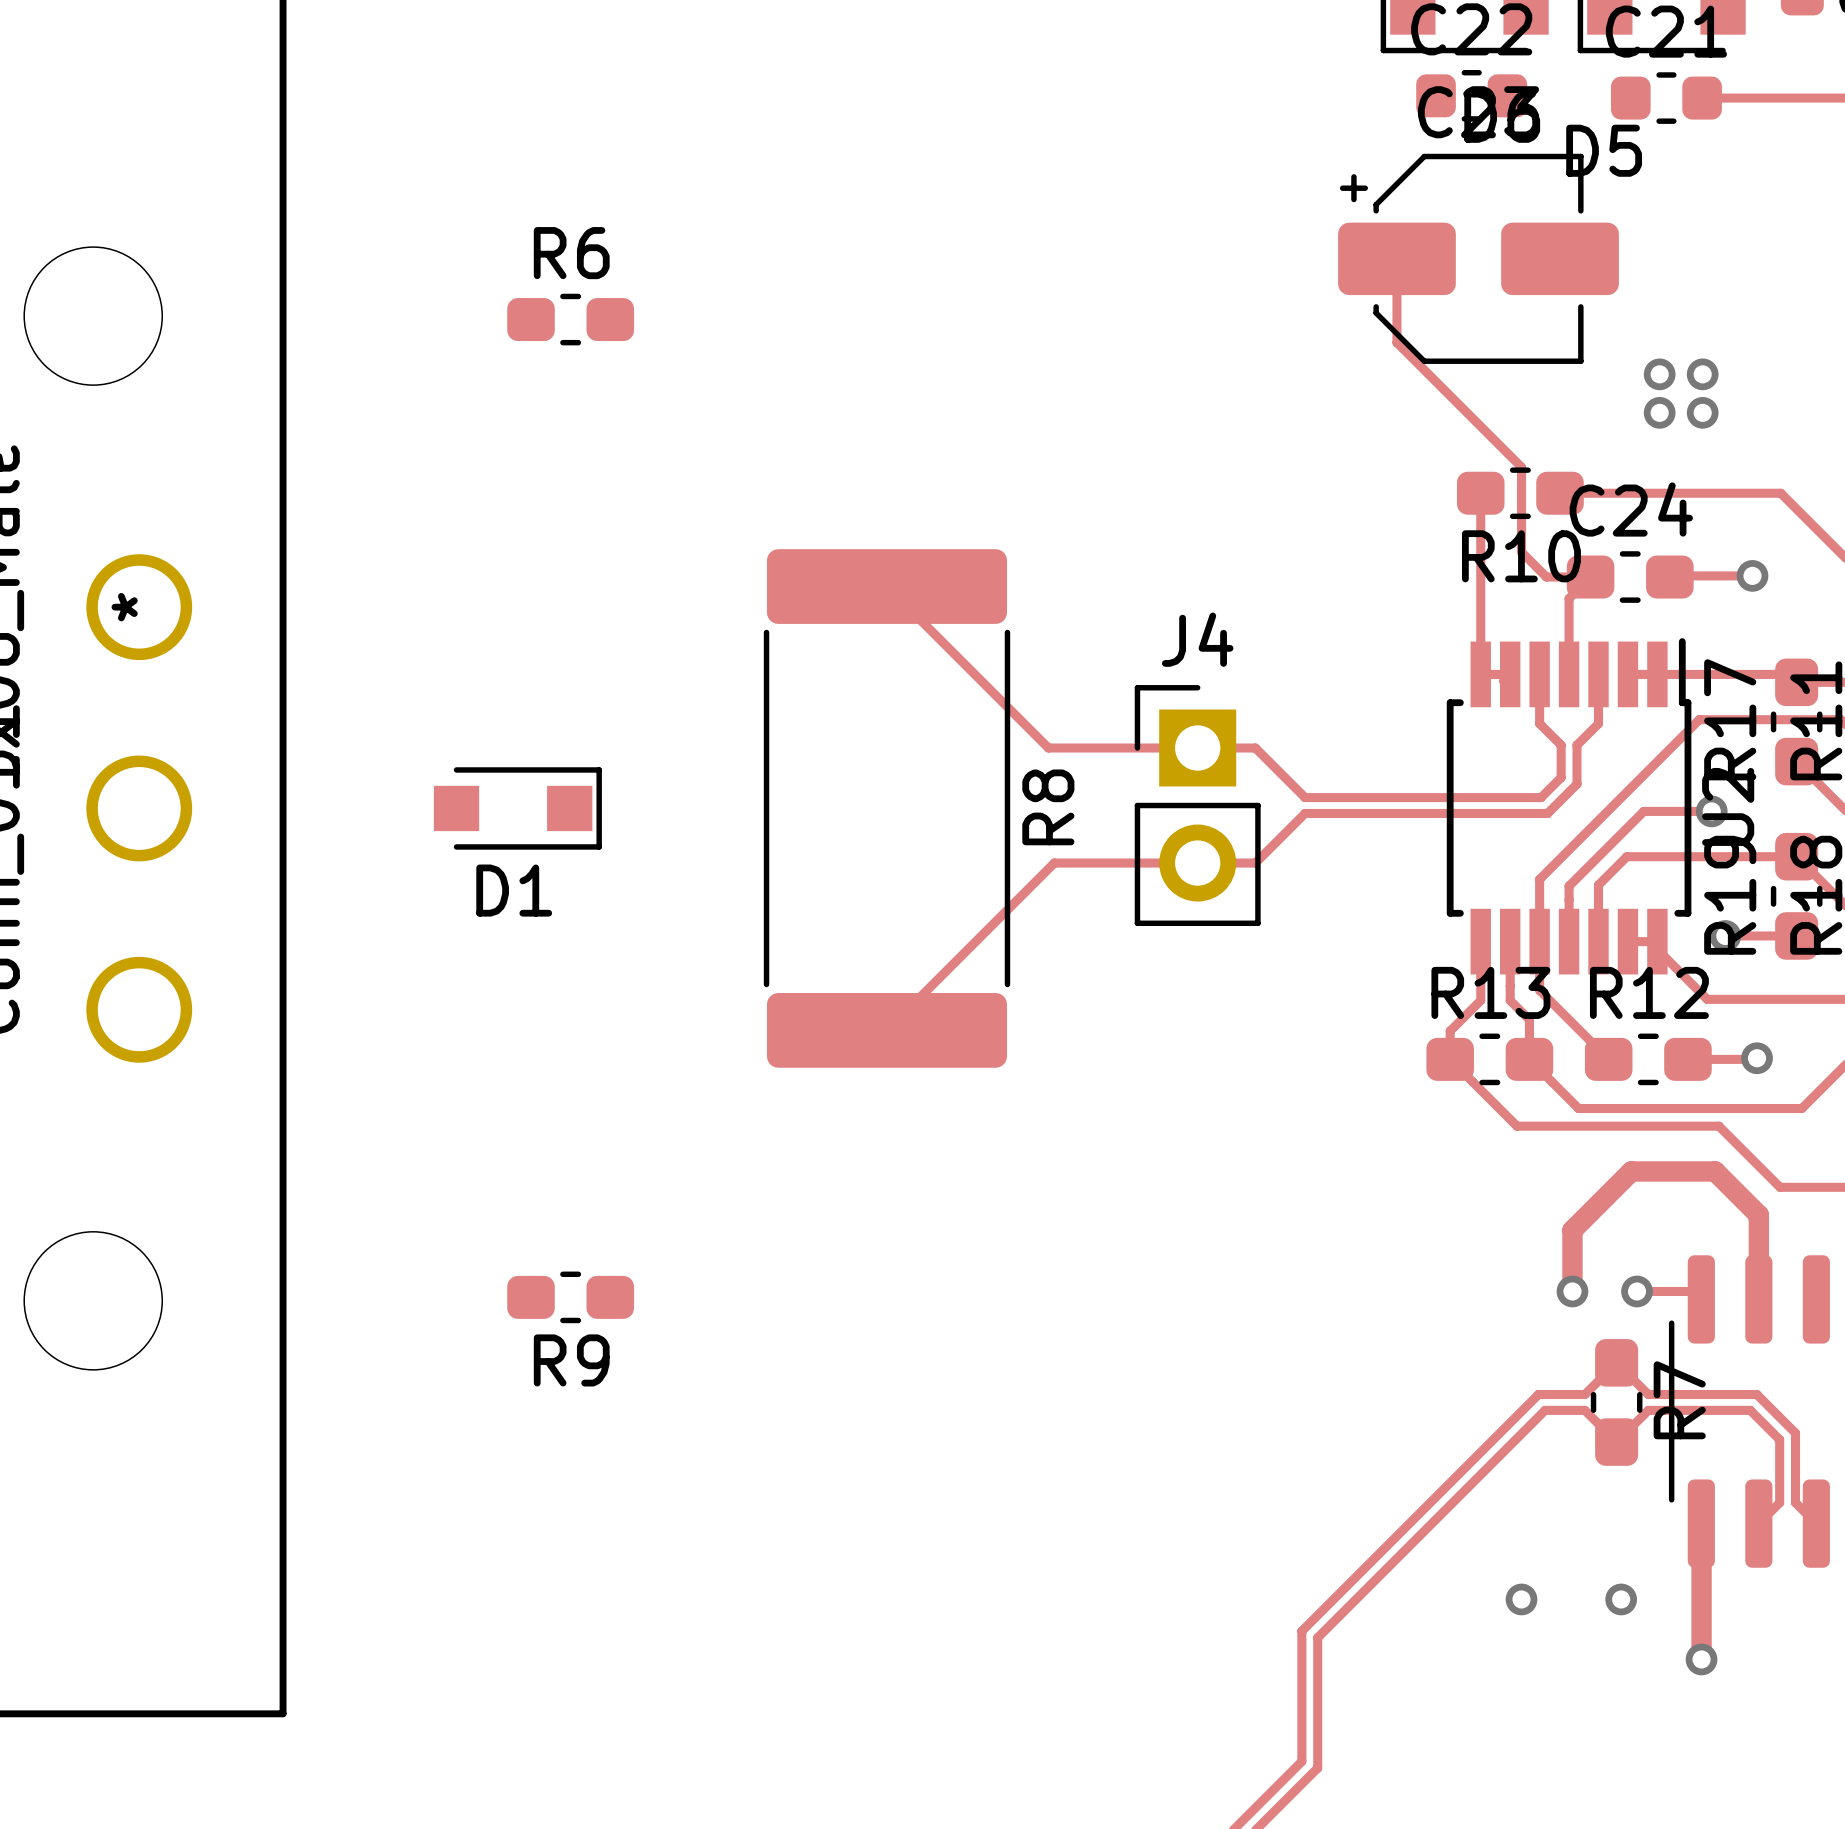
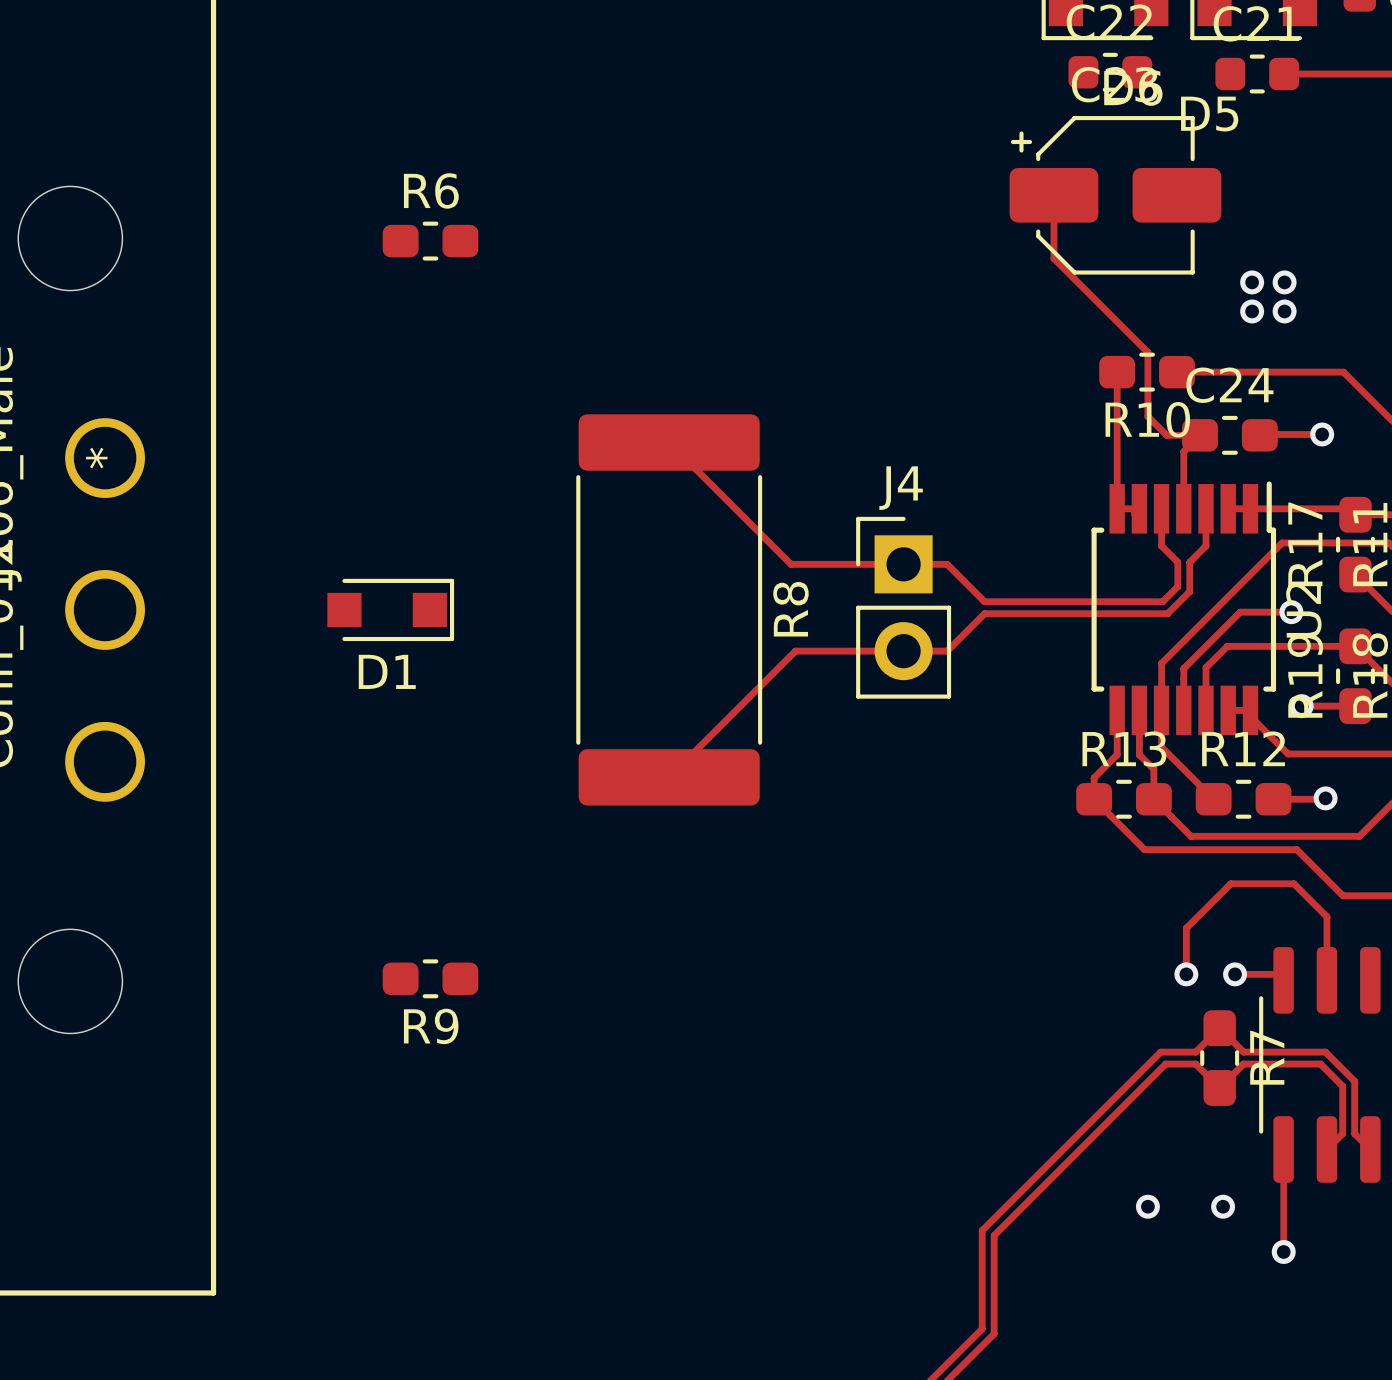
track width: thick (1572, 1291) (1572, 1230) (1631, 1171) (1715, 1171) (1758, 1215) (1758, 1299) -> thin (1186, 974) (1186, 928) (1230, 883) (1293, 883) (1326, 916) (1326, 980)
track width: thick (1701, 1523) (1701, 1659) -> thin (1283, 1149) (1283, 1251)

